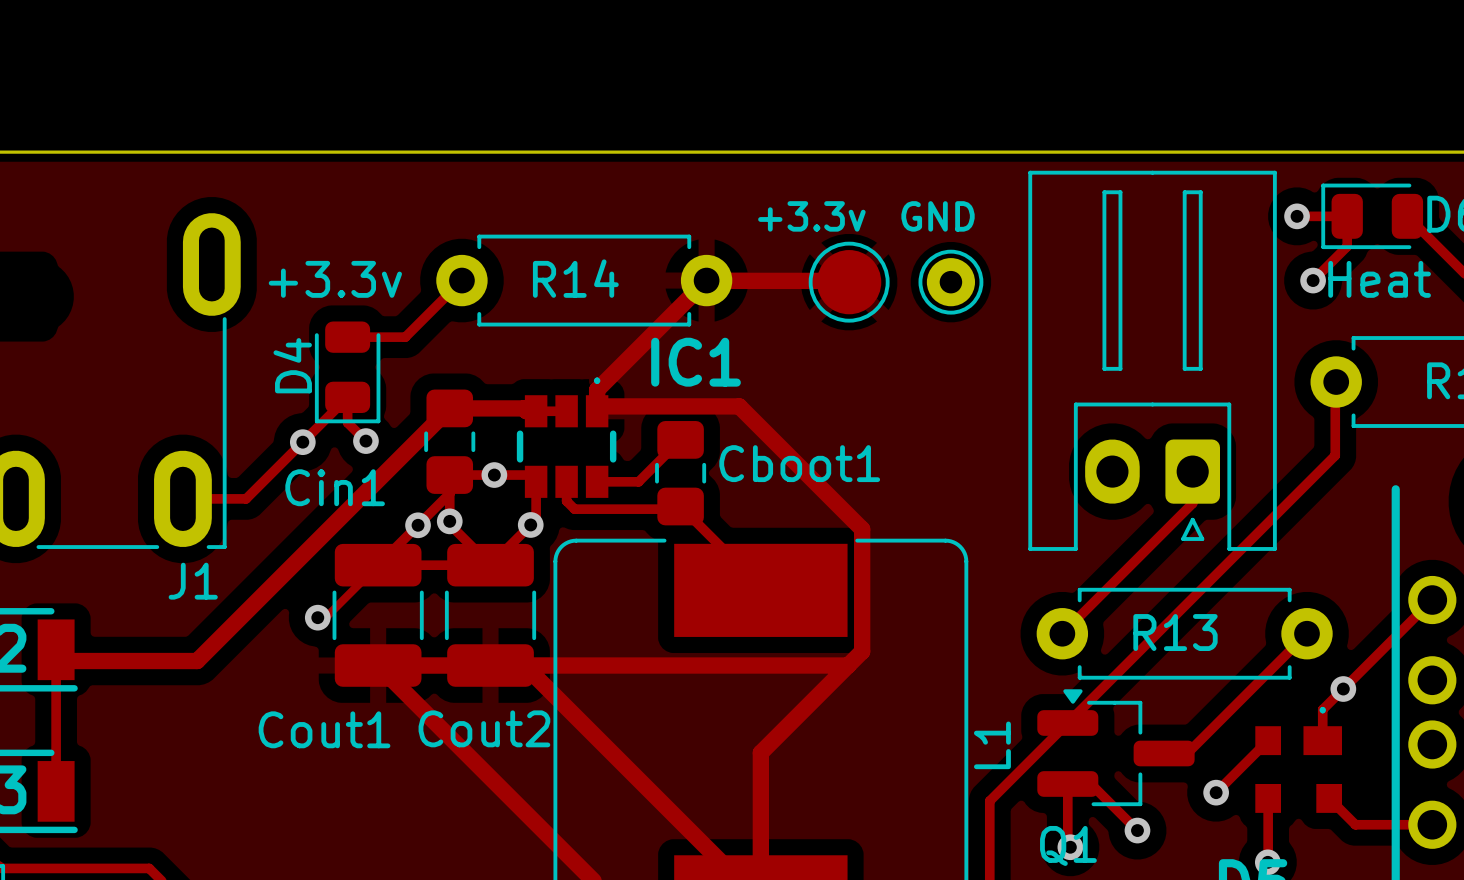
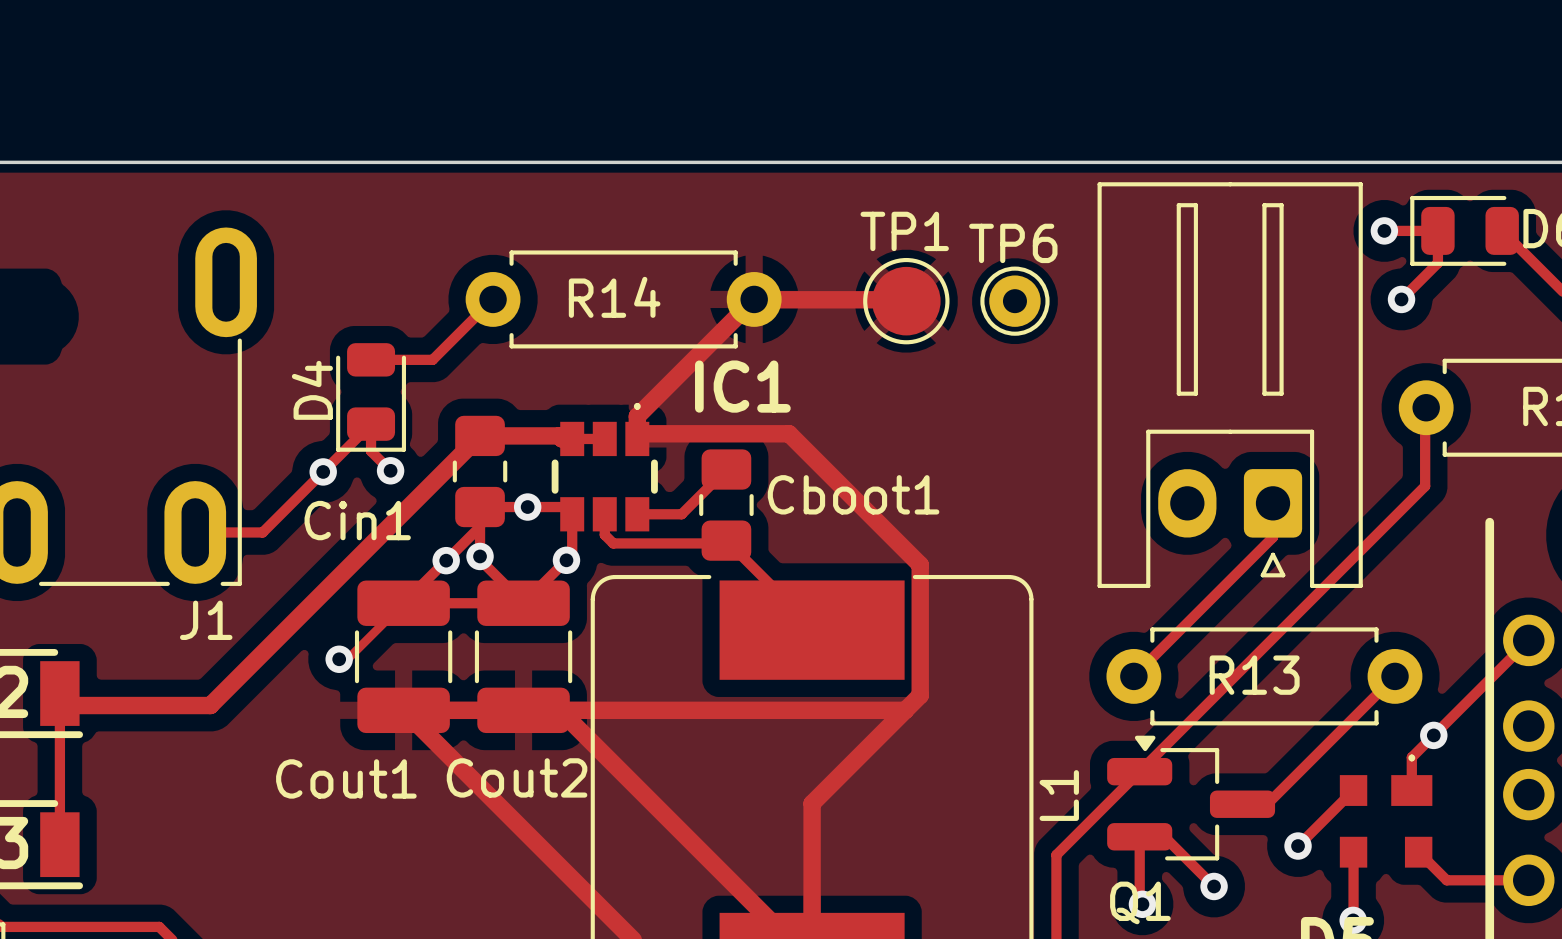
text: +3.3v (811, 216) -> none
TP1 name: none -> TP1 (904, 231)
text: GND (938, 216) -> none
TP6 name: none -> TP6 (1013, 243)
text: +3.3v (335, 279) -> none
text: Heat (1379, 279) -> none

